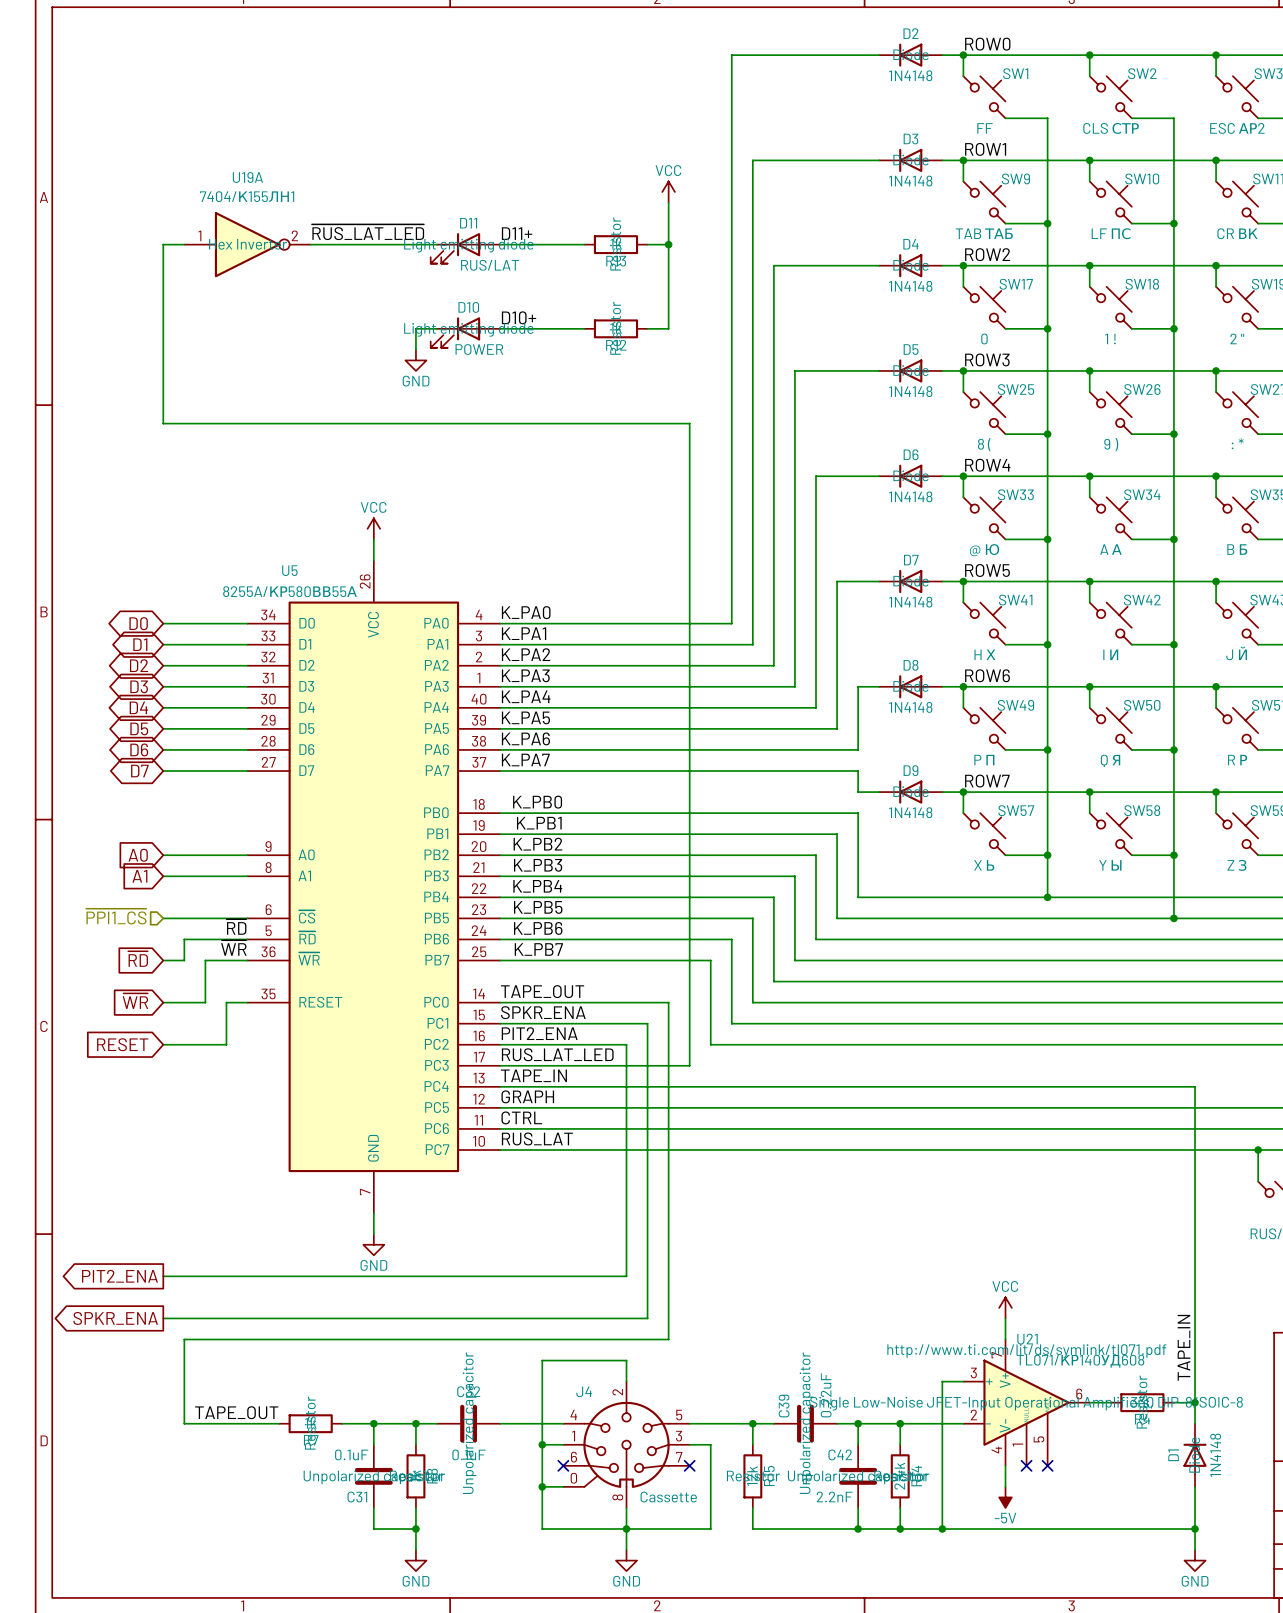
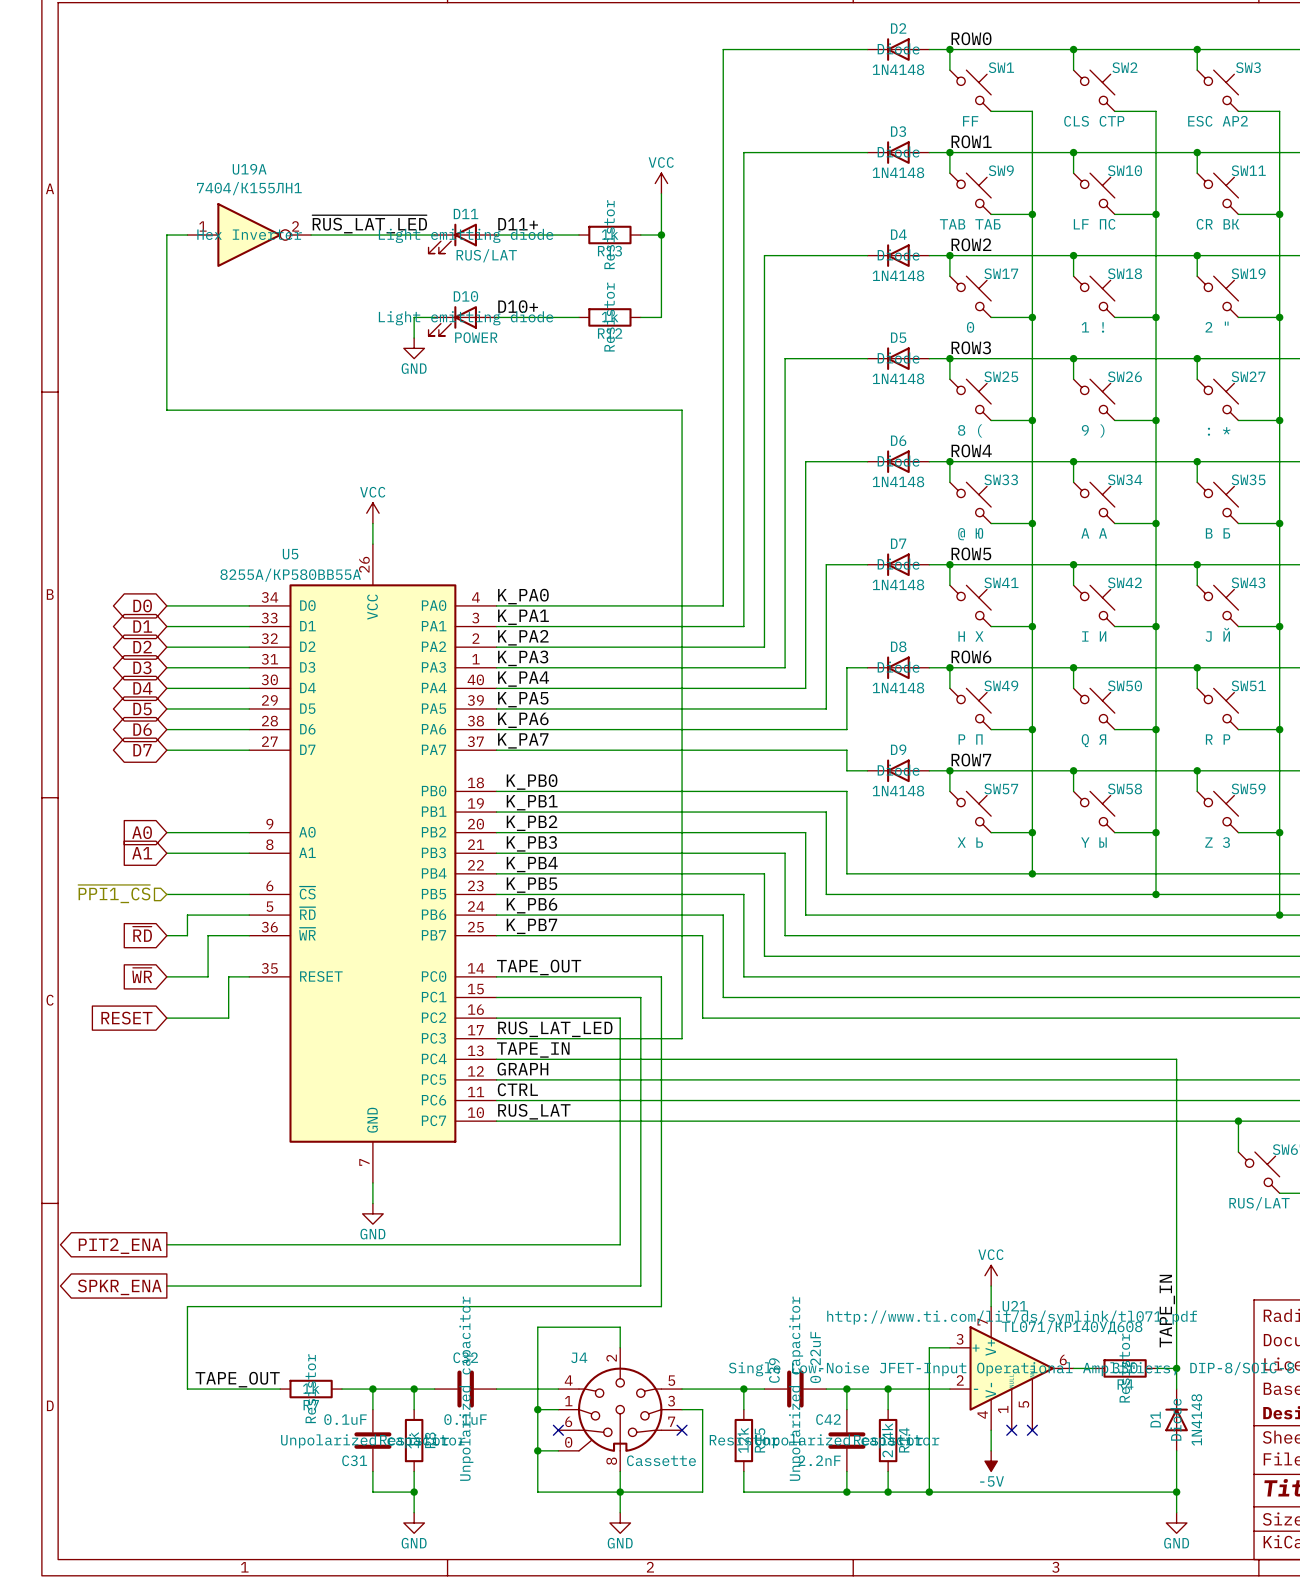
label: ~{RD} (236, 926) -> none
label: ~{WR} (233, 948) -> none
label: SPKR_ENA (543, 1012) -> none
label: PIT2_ENA (539, 1033) -> none

